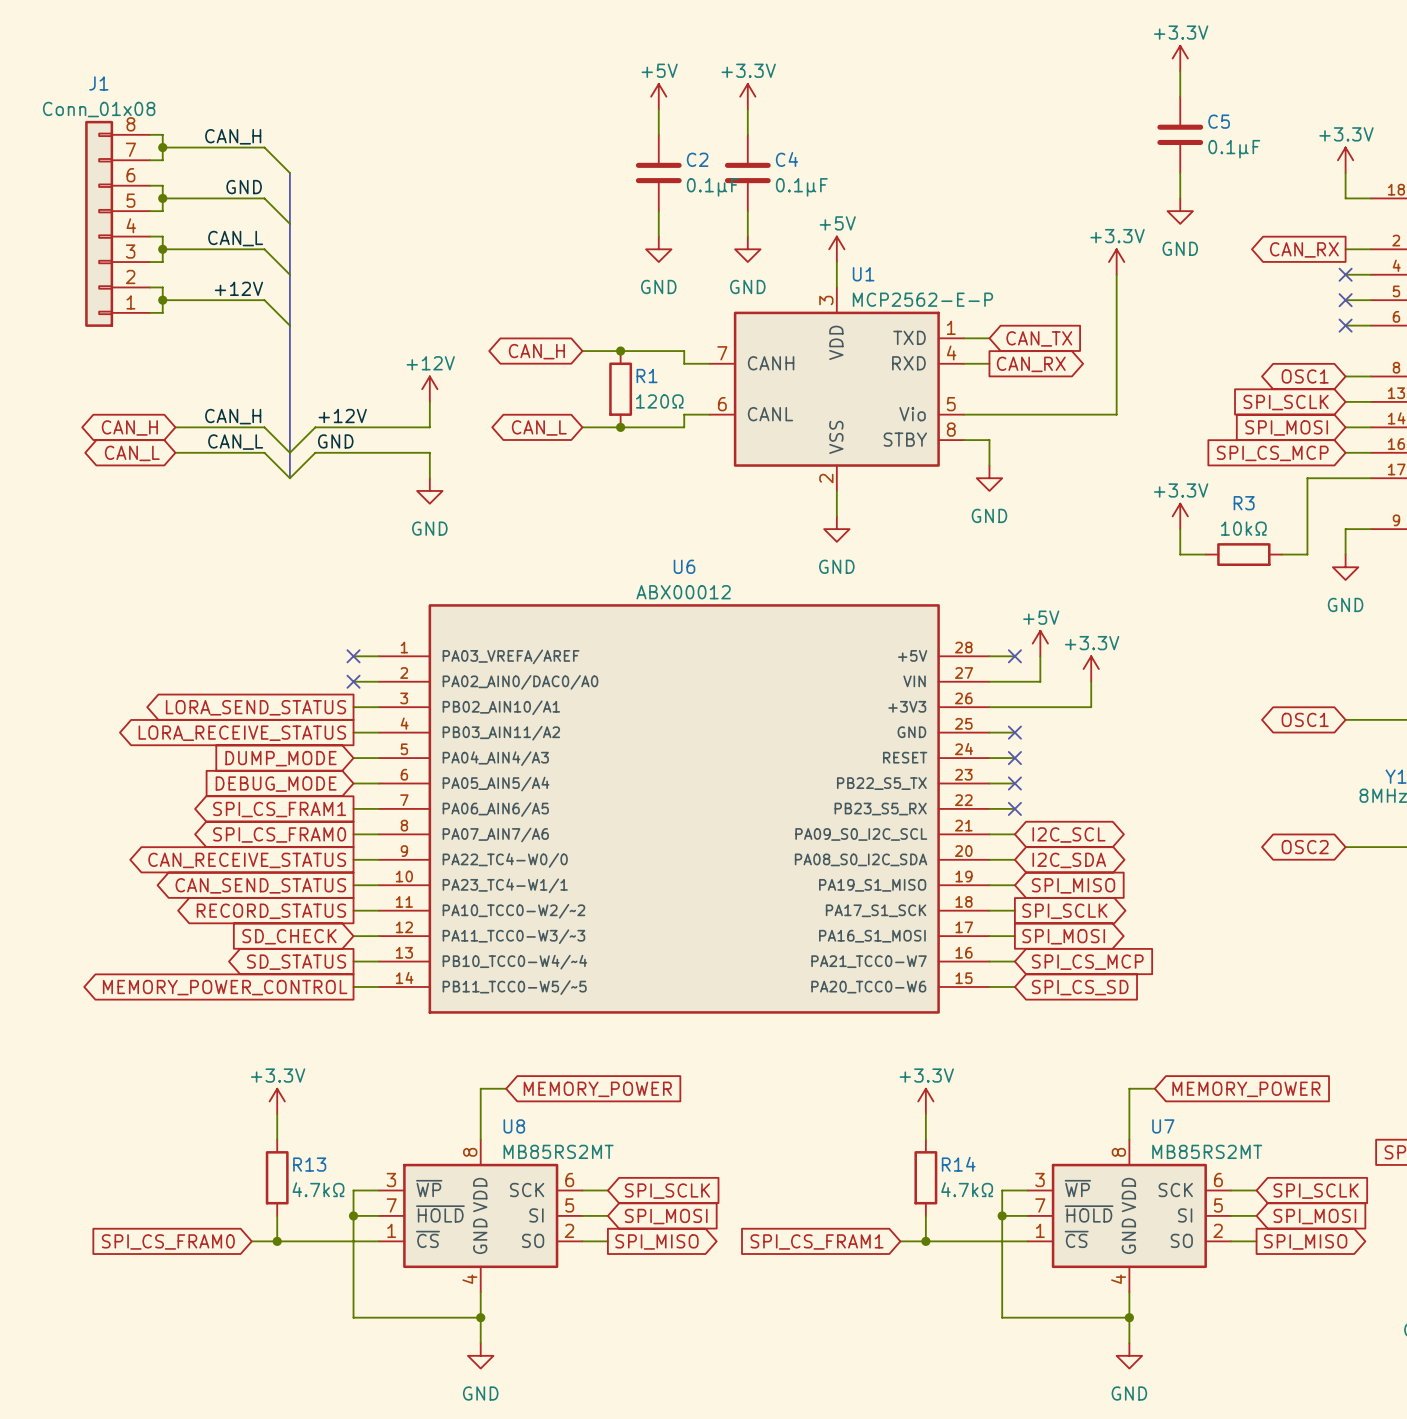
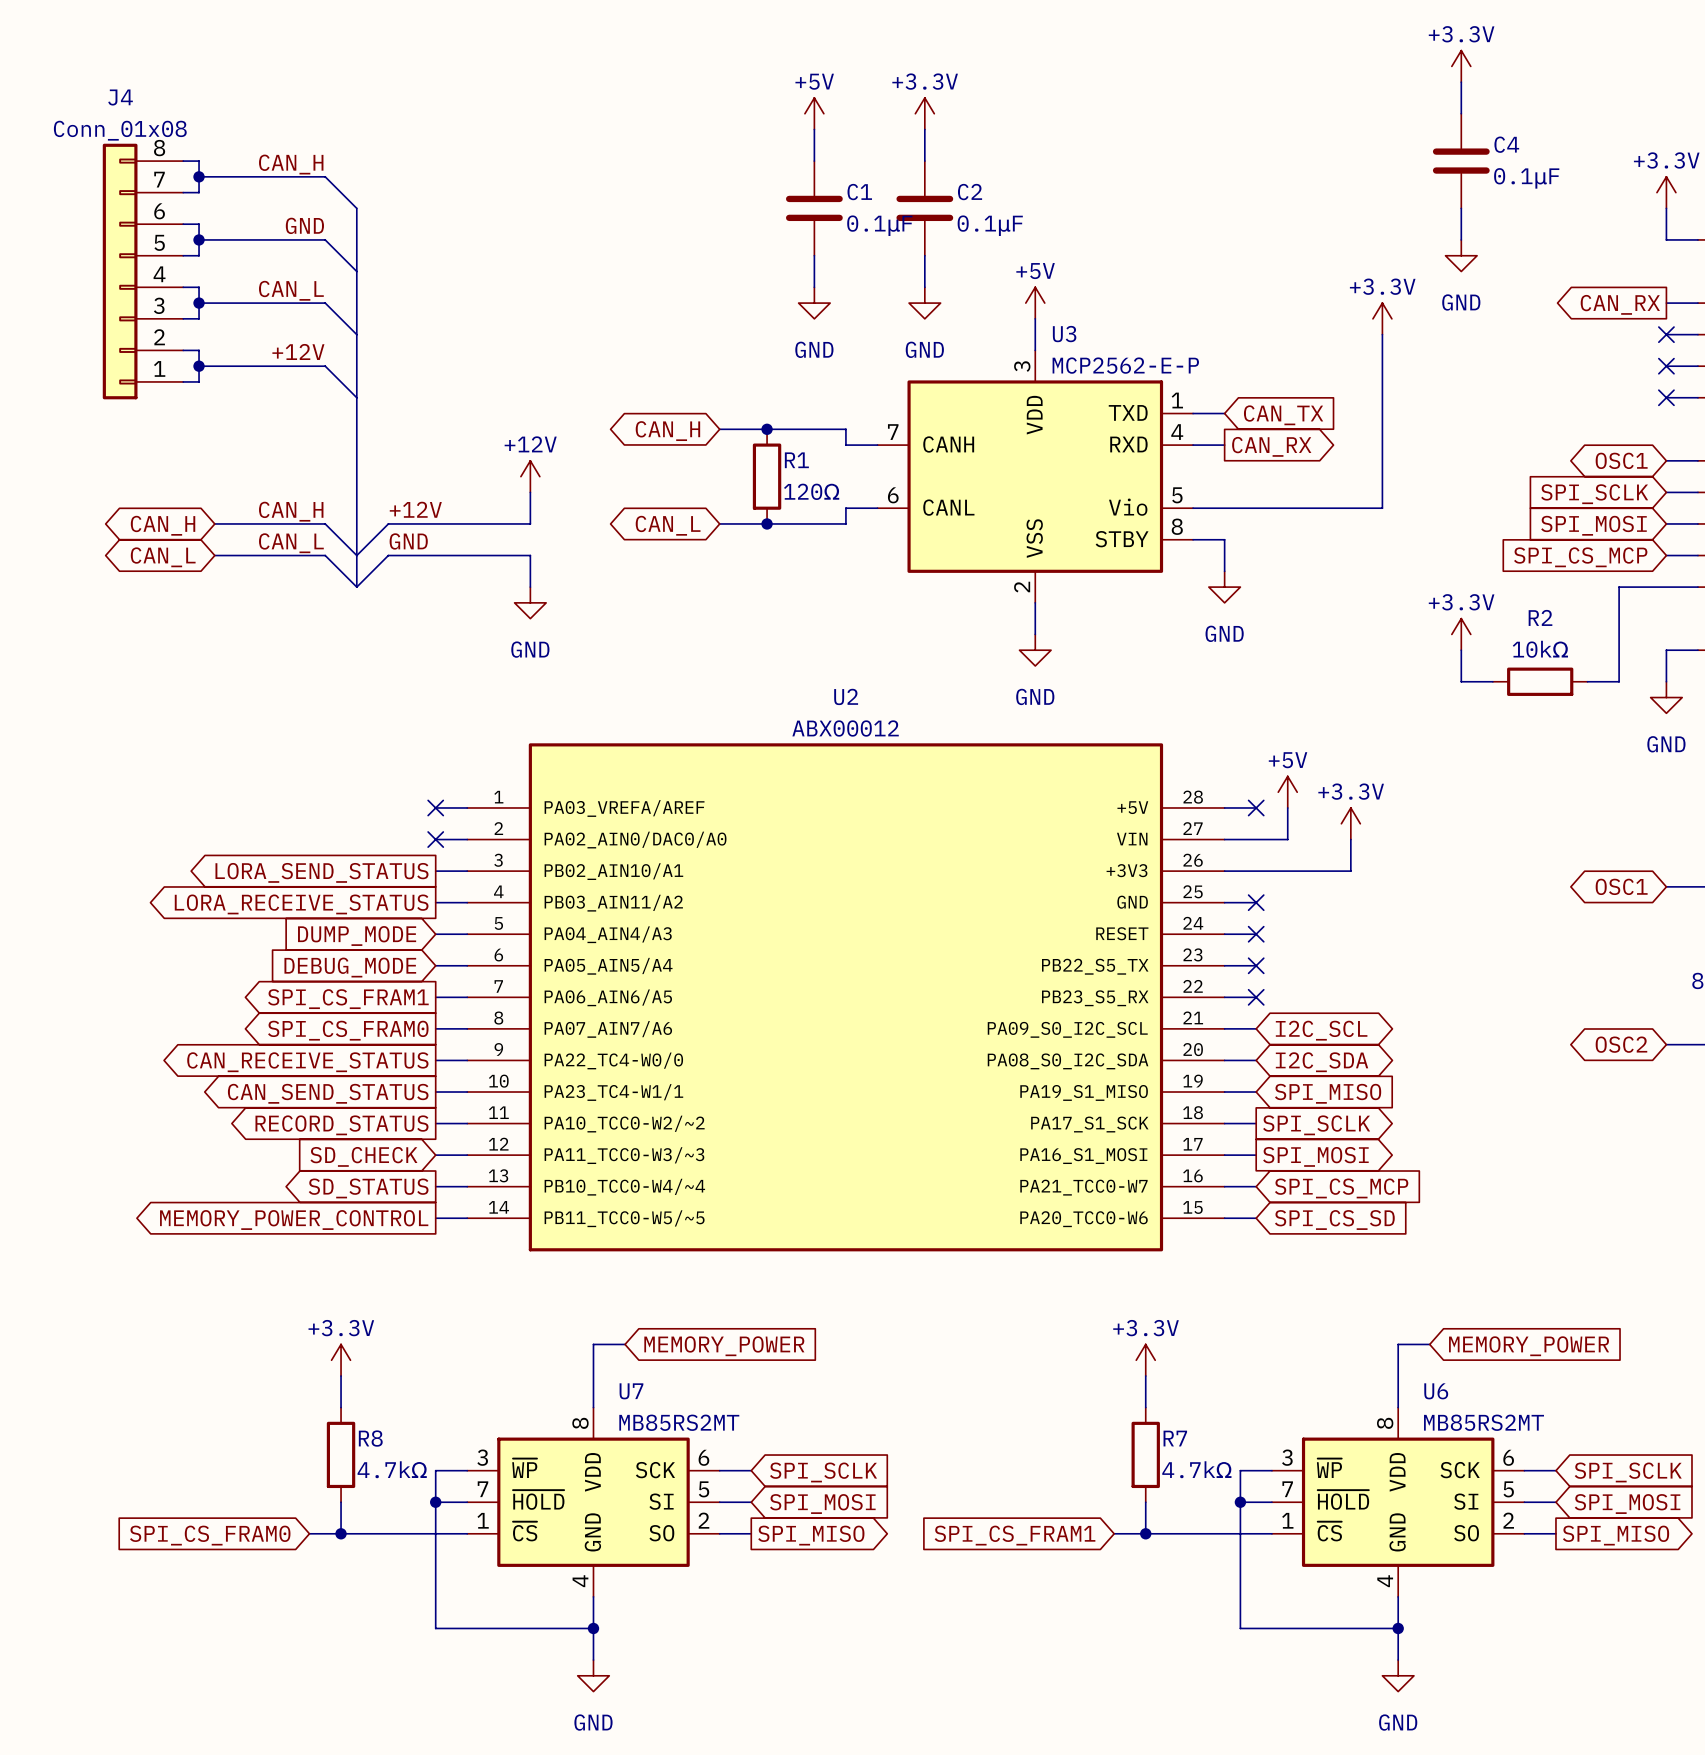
J1 name: J1 (98, 83) -> J4 (120, 97)
C5 name: C5 (1219, 121) -> C4 (1506, 144)
C2 name: C2 (697, 159) -> C1 (859, 192)
C4 name: C4 (786, 159) -> C2 (970, 192)
U1 name: U1 (863, 274) -> U3 (1064, 334)
R3 name: R3 (1244, 503) -> R2 (1540, 617)
U6 name: U6 (684, 566) -> U2 (846, 696)
U8 name: U8 (514, 1126) -> U7 (631, 1391)
U7 name: U7 (1163, 1126) -> U6 (1436, 1391)
R13 name: R13 (309, 1164) -> R8 (370, 1438)
R14 name: R14 (958, 1164) -> R7 (1175, 1438)

